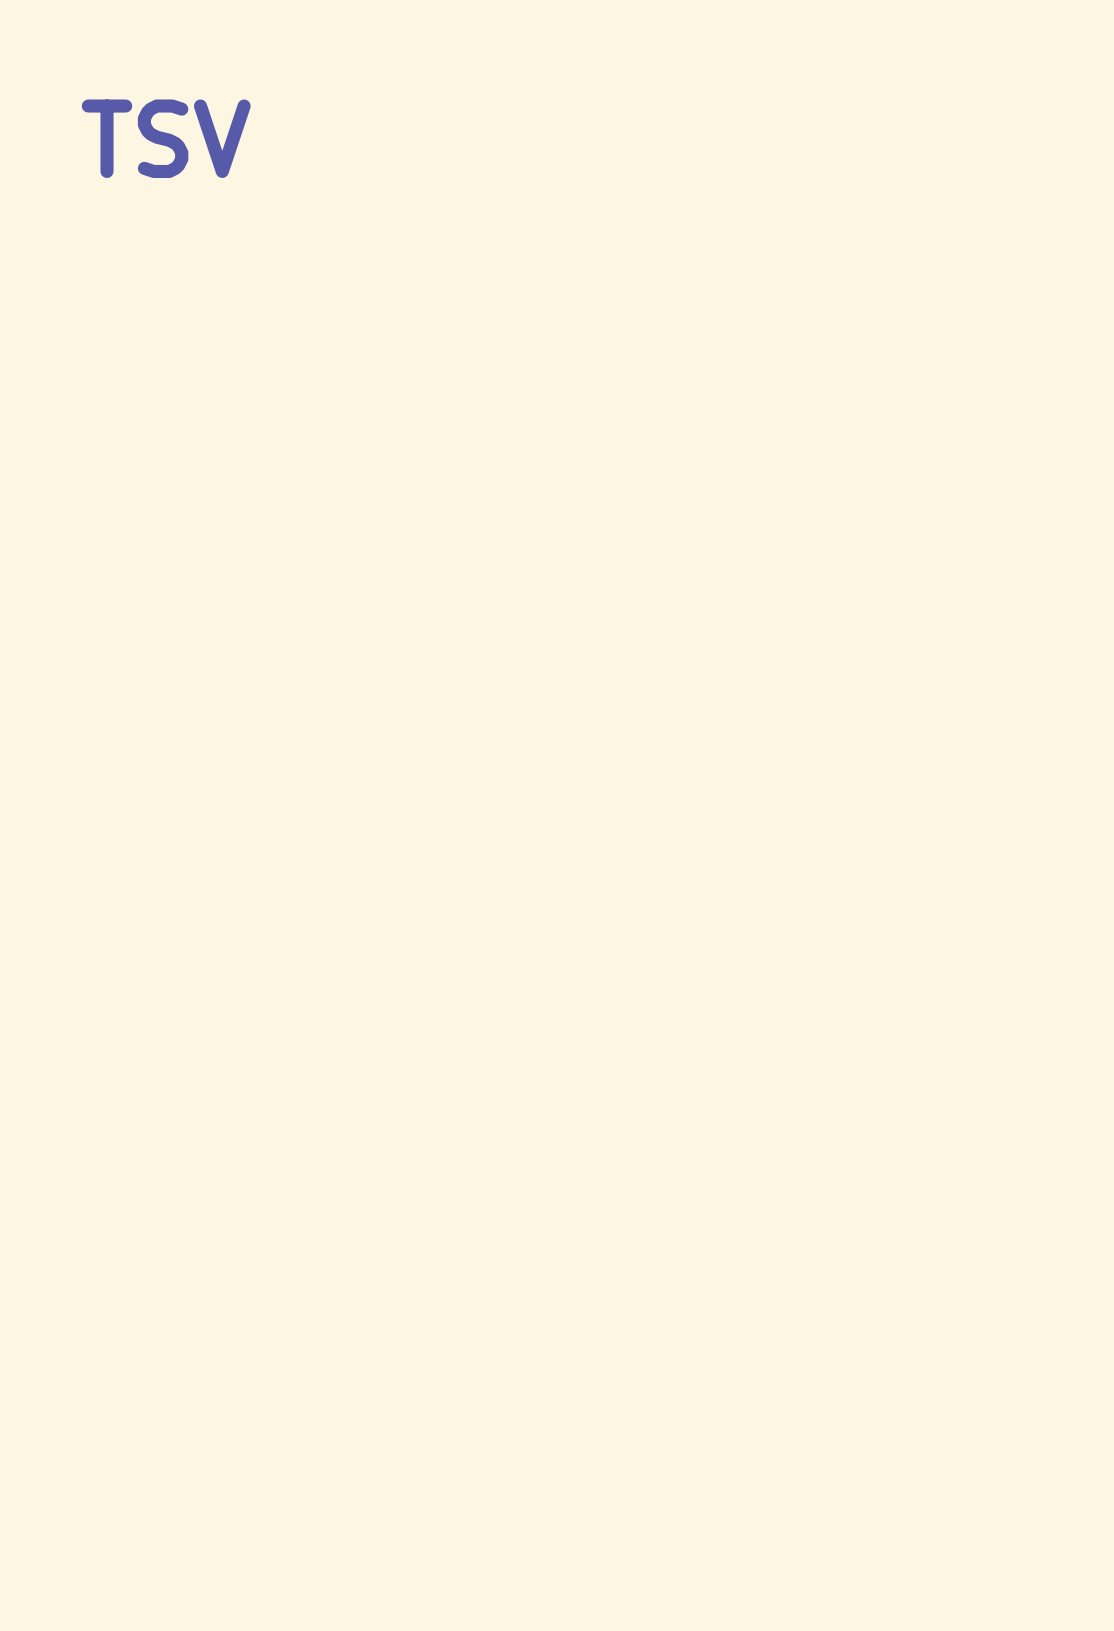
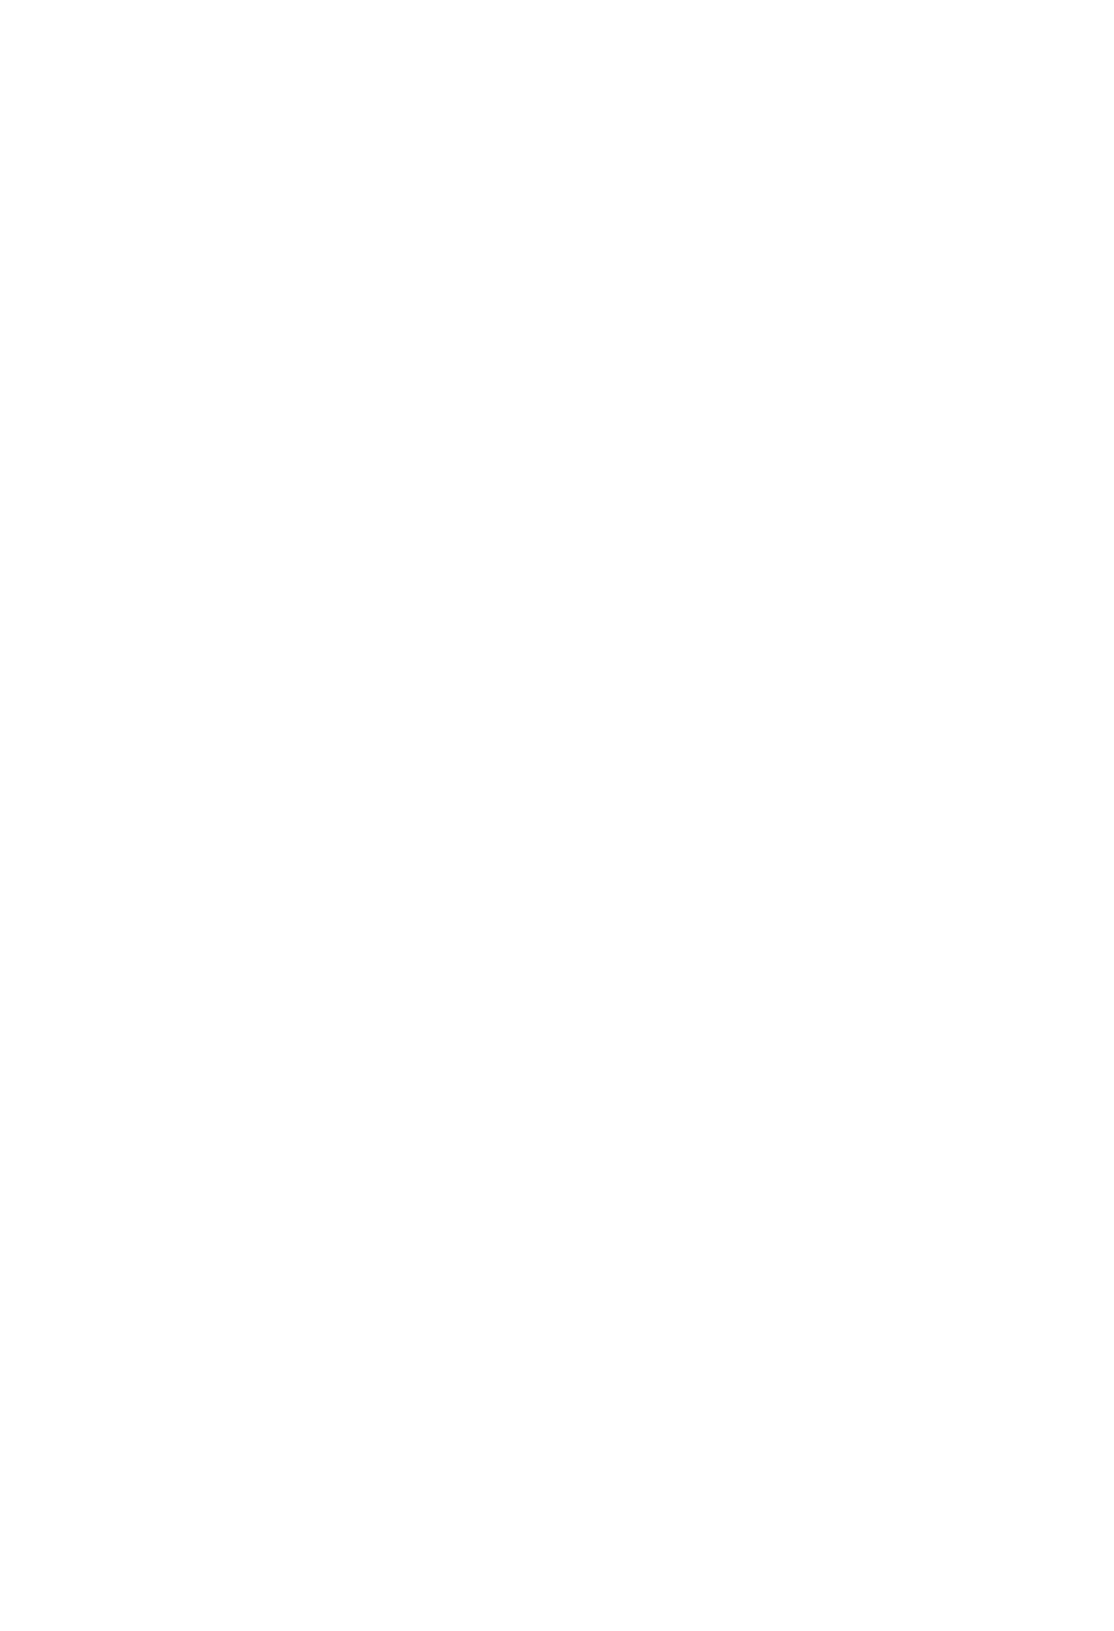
text: TSV (166, 138) -> none

